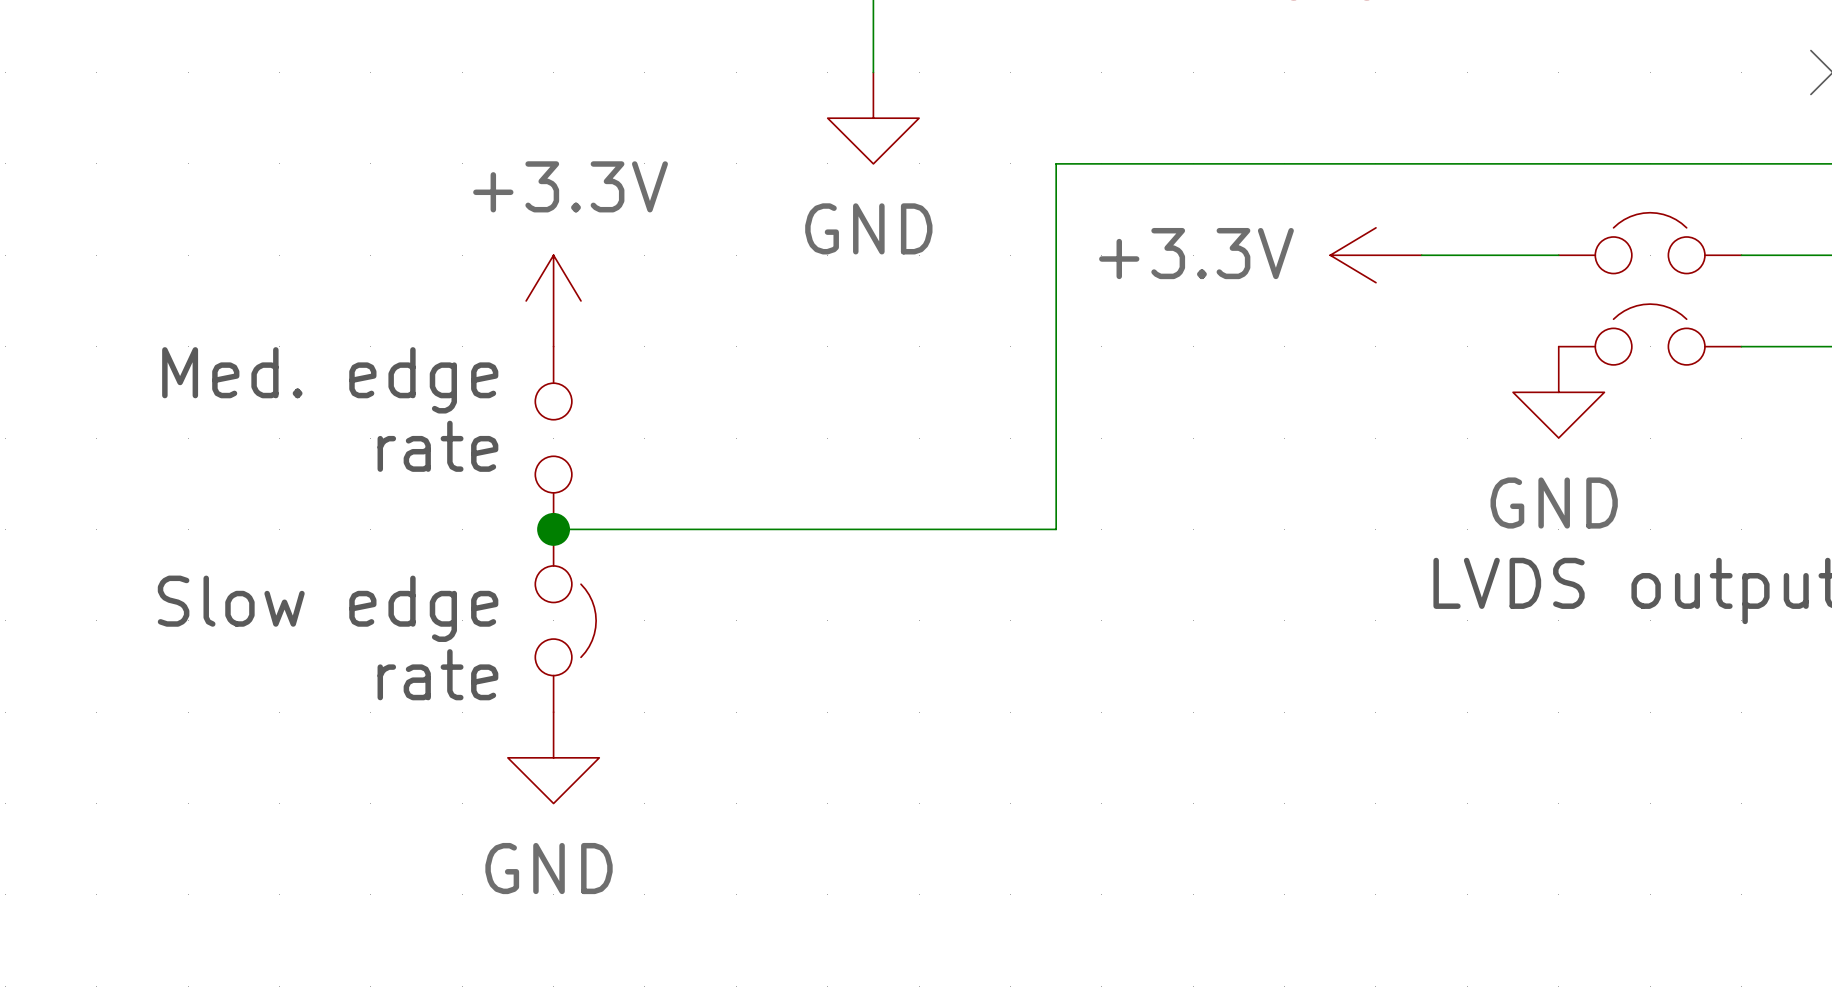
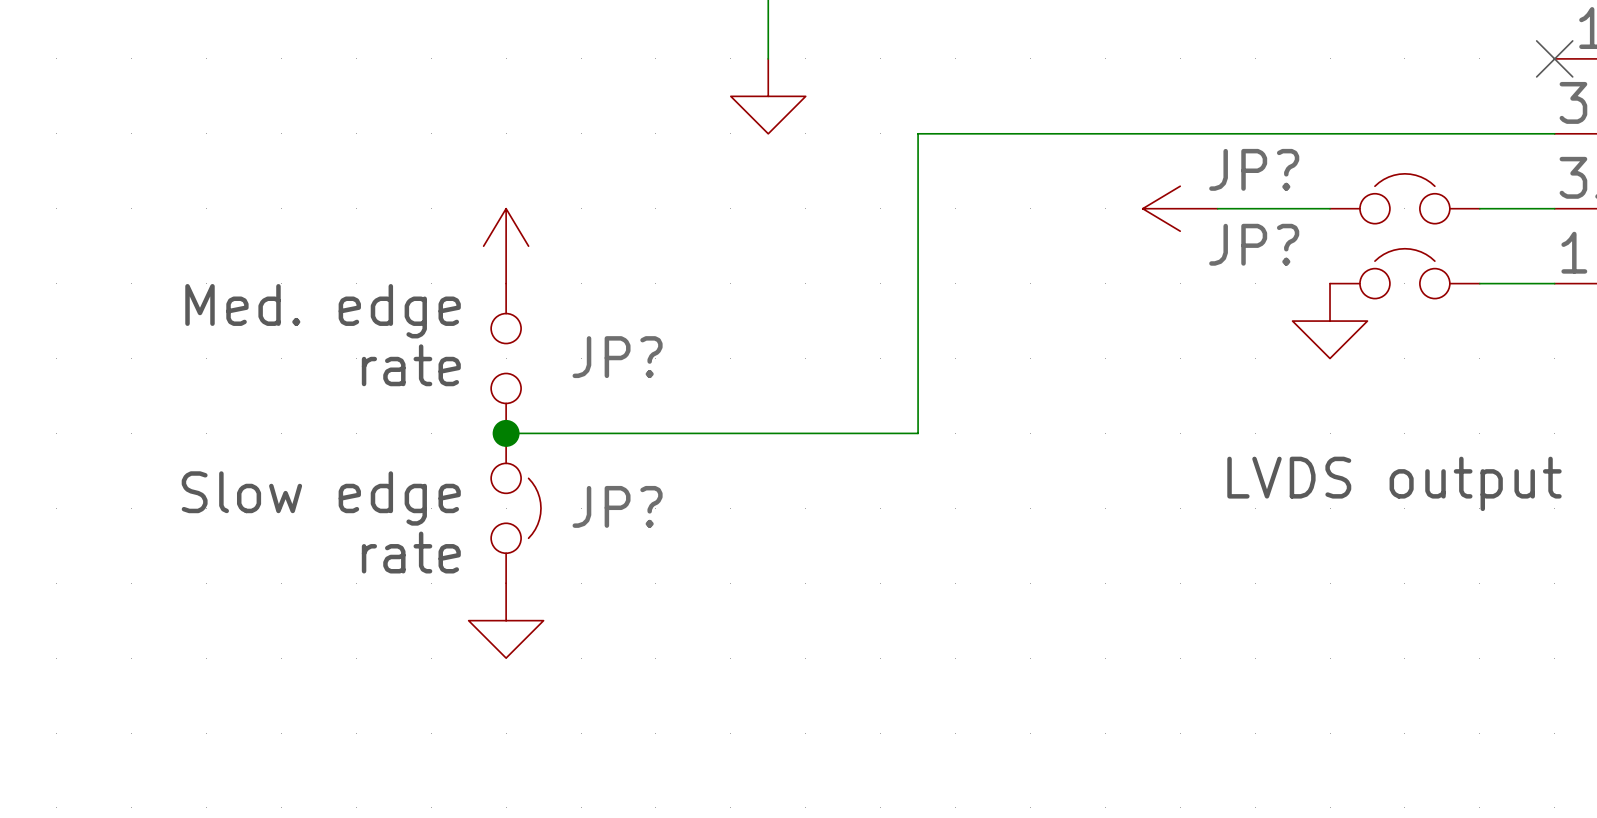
power symbol text: +3.3V (570, 186) -> none
JP? name: none -> JP? (1254, 169)
power symbol text: GND (868, 228) -> none
power symbol text: +3.3V (1196, 253) -> none
JP? name: none -> JP? (1254, 244)
JP? name: none -> JP? (617, 357)
power symbol text: GND (1554, 503) -> none
JP? name: none -> JP? (617, 506)
power symbol text: GND (549, 868) -> none

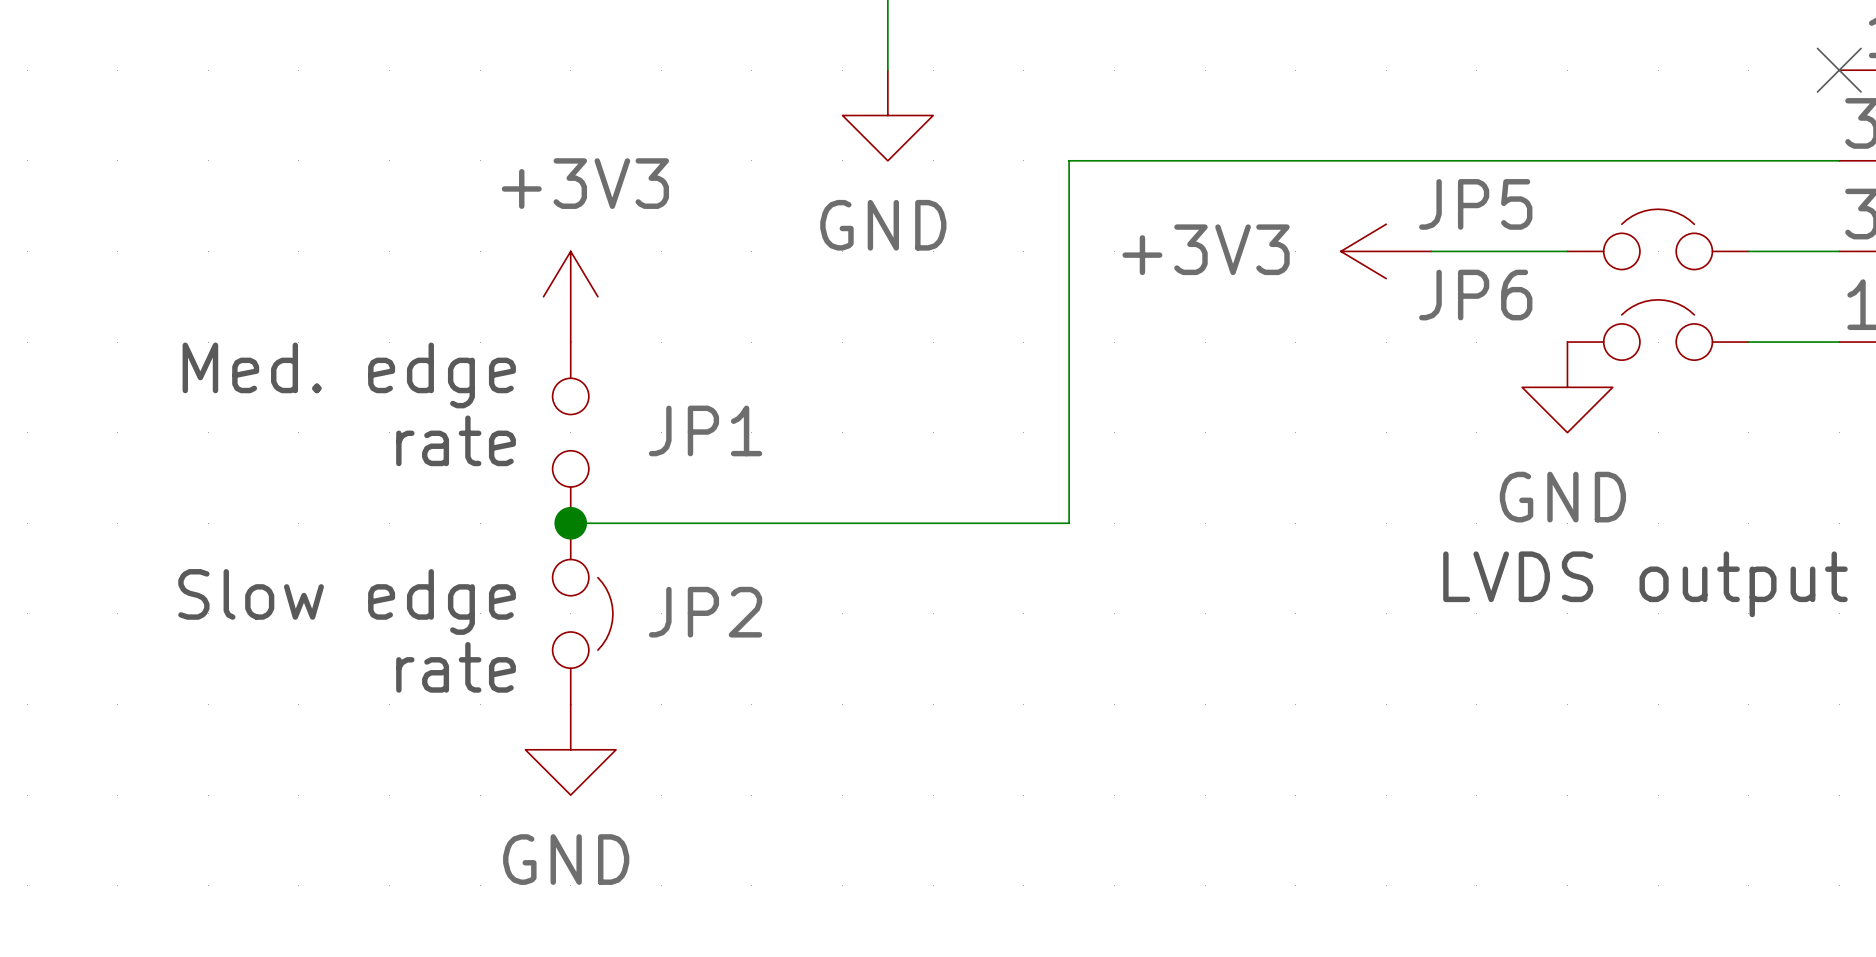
power symbol text: none -> +3V3 (585, 183)
JP? name: JP? (1254, 169) -> JP5 (1475, 204)
power symbol text: none -> GND (883, 225)
power symbol text: none -> +3V3 (1206, 249)
JP? name: JP? (1254, 244) -> JP6 (1475, 295)
JP? name: JP? (617, 357) -> JP1 (705, 430)
power symbol text: none -> GND (1562, 497)
JP? name: JP? (617, 506) -> JP2 (705, 612)
power symbol text: none -> GND (566, 859)

